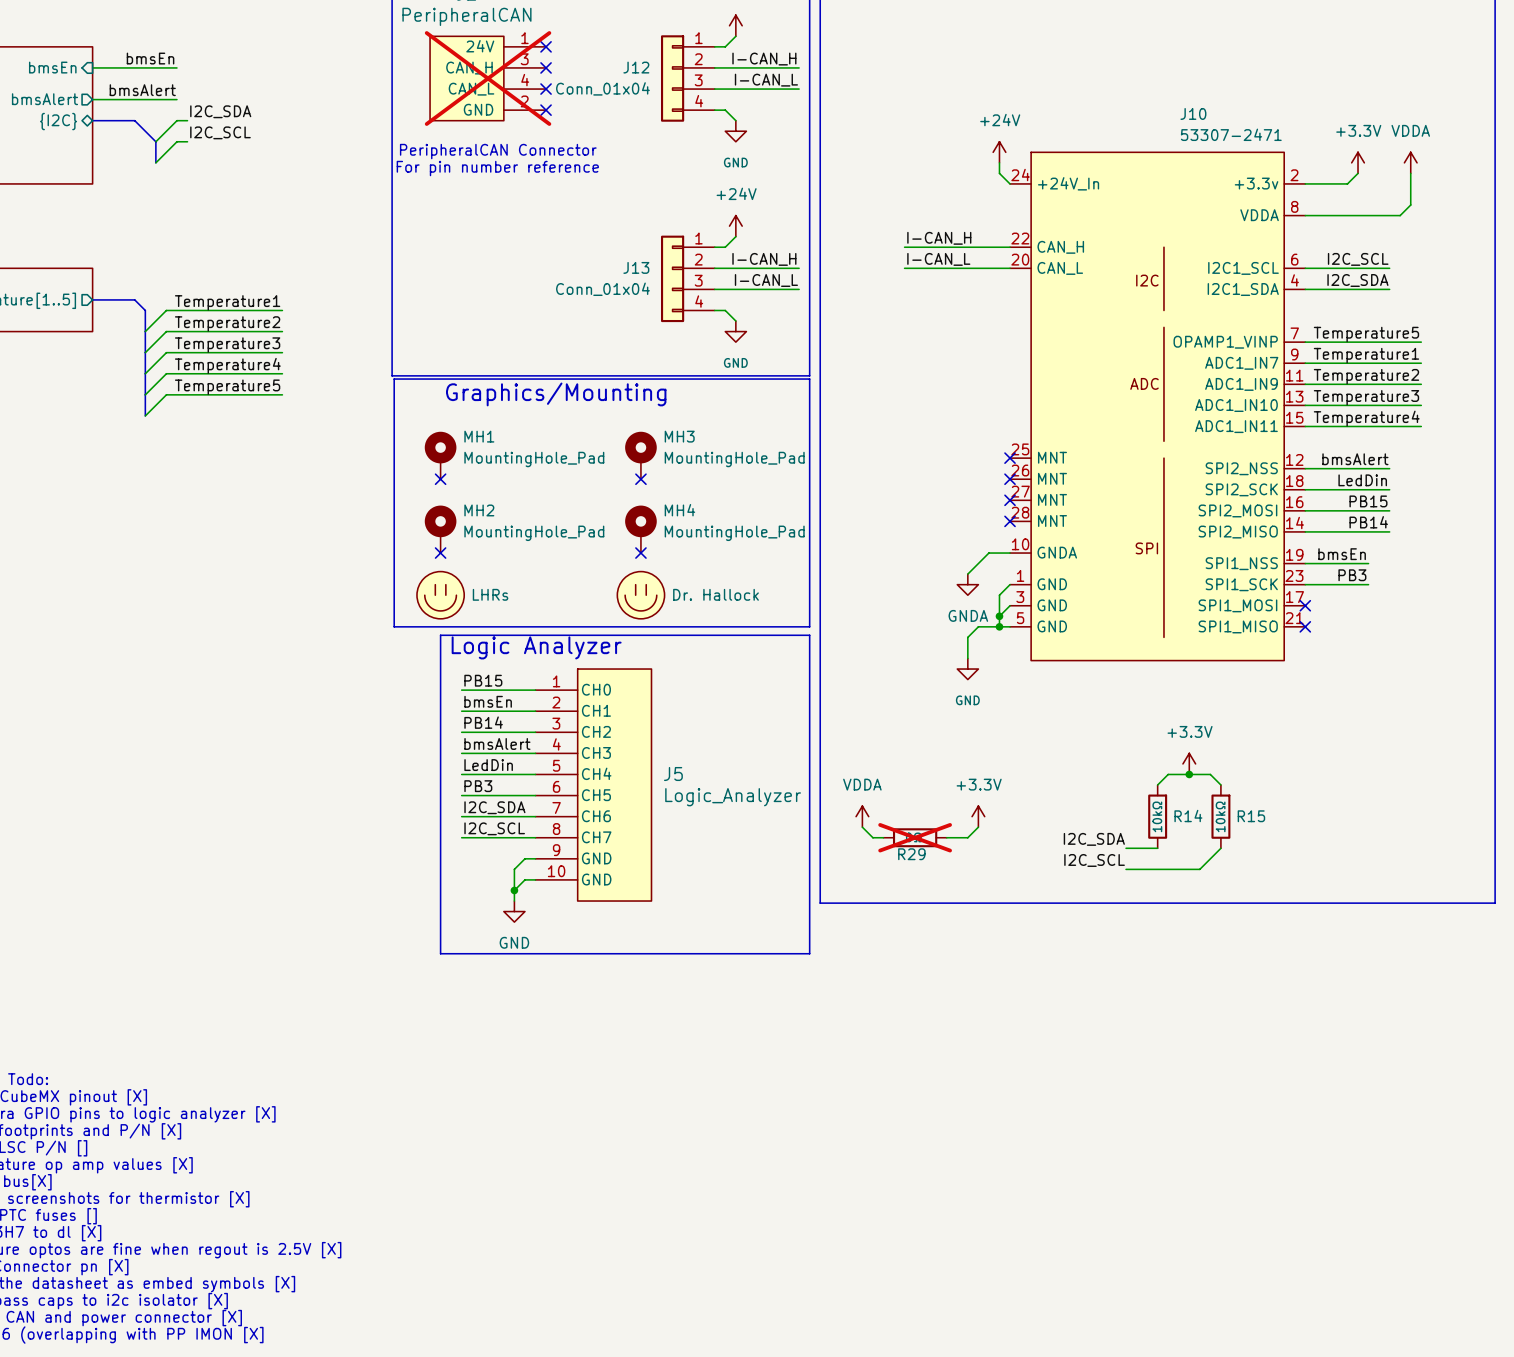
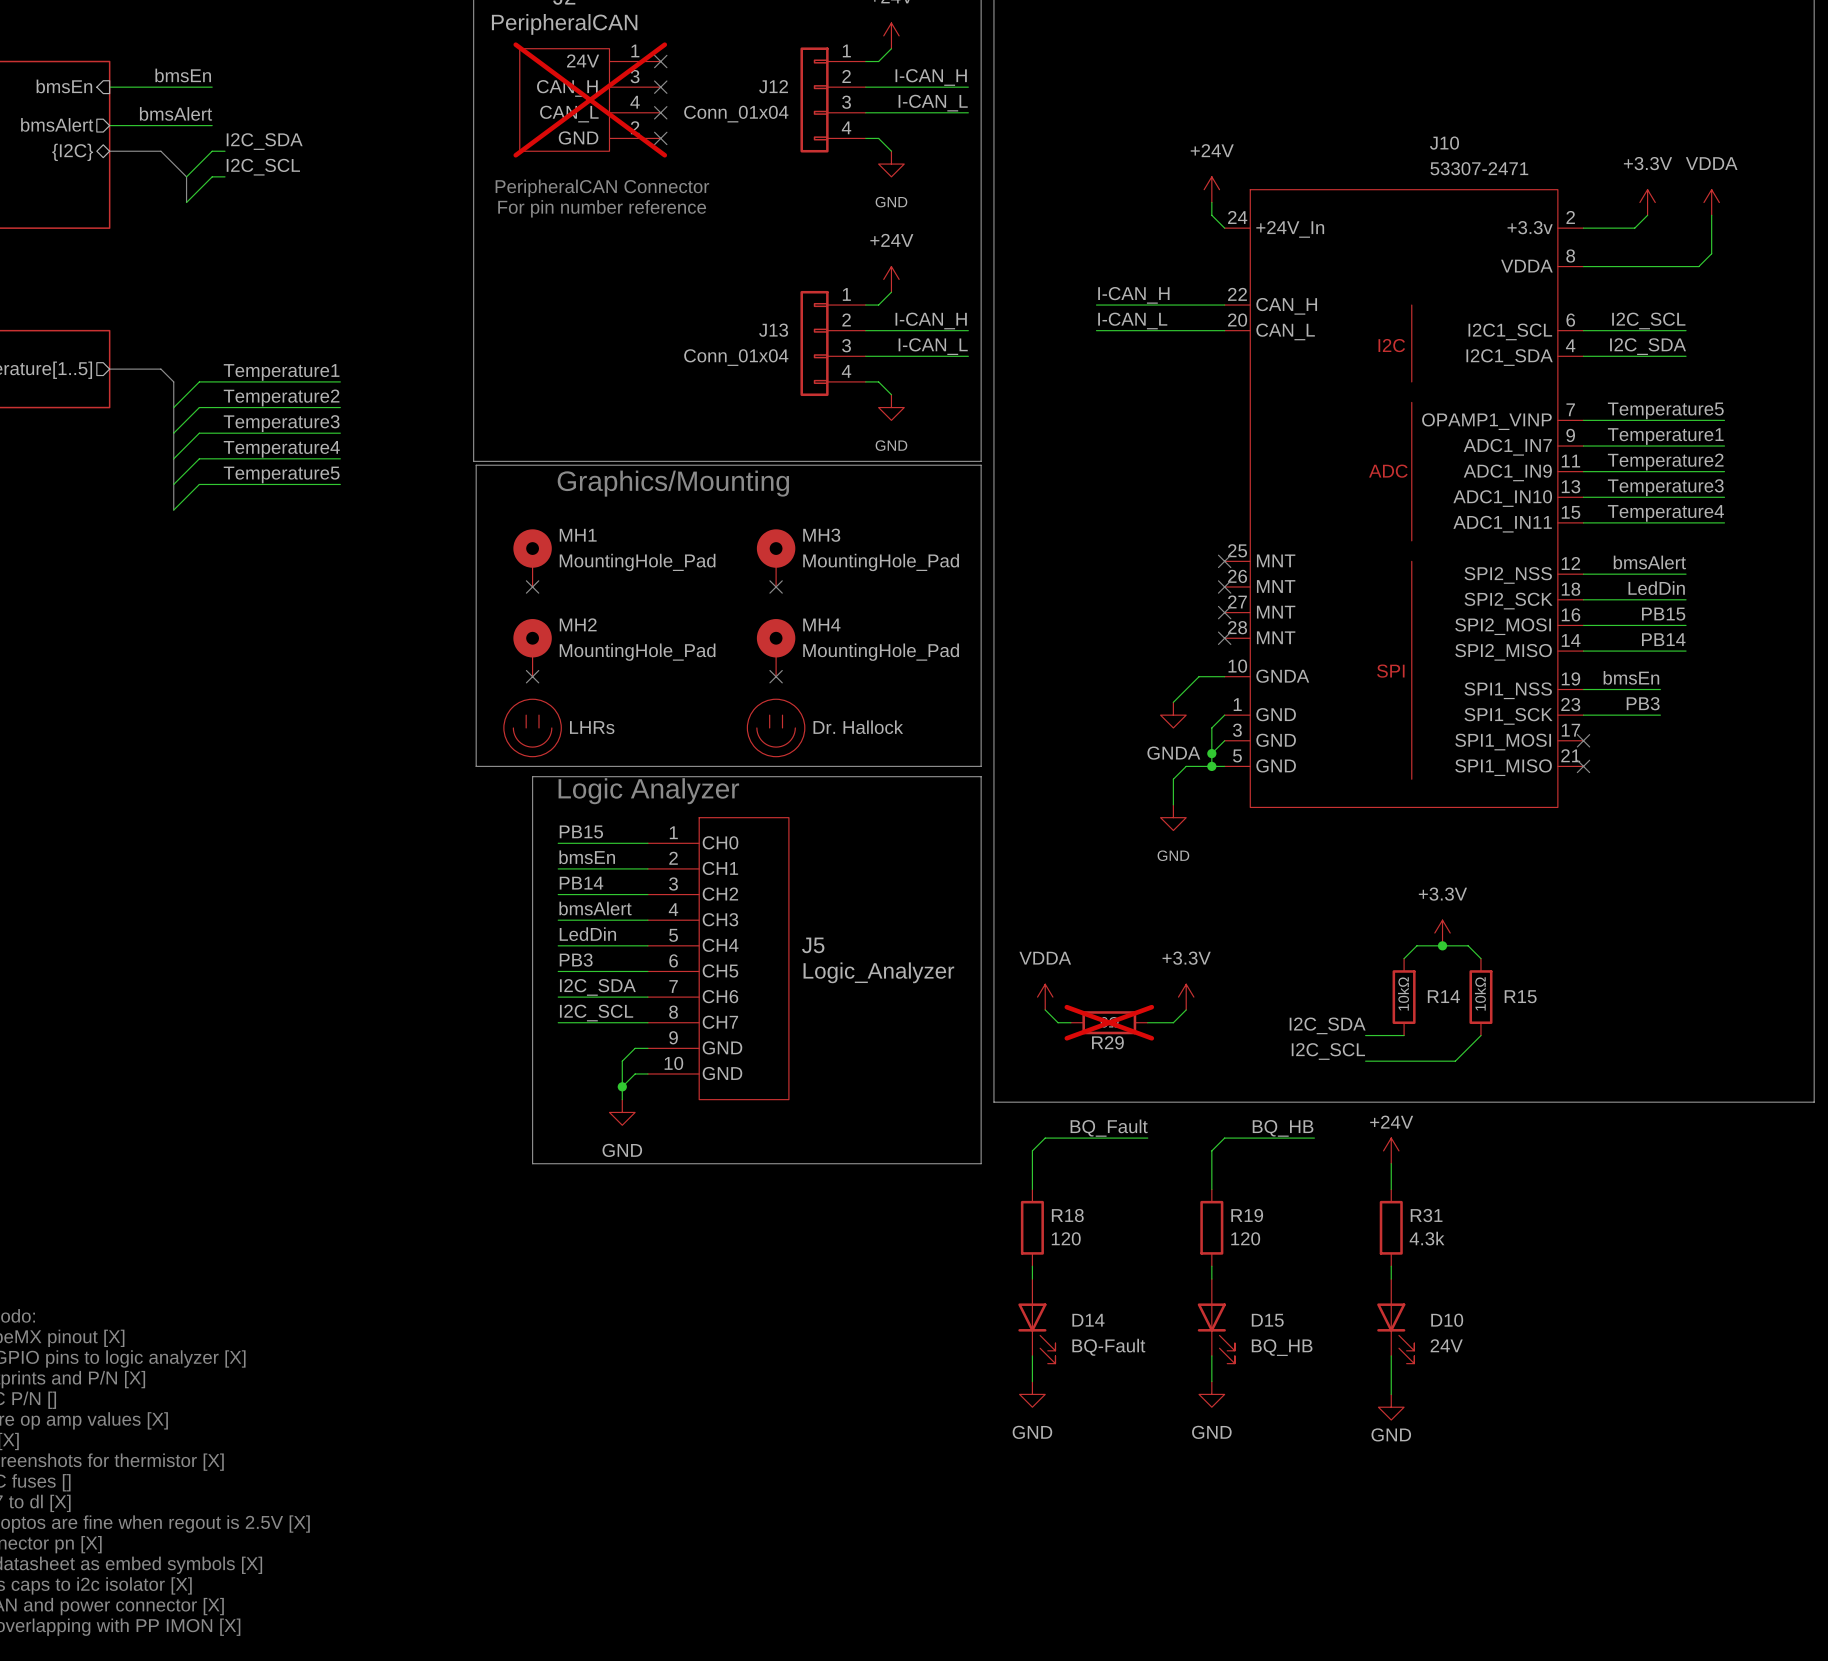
label: none -> BQ_Fault (1109, 1128)
label: none -> BQ_HB (1283, 1128)
wire: none -> (1147, 1138) (1045, 1138) (1032, 1150) (1032, 1189)
wire: none -> (1314, 1138) (1224, 1138) (1211, 1150) (1211, 1189)
power symbol: none -> +24V (1391, 1150)
wire: none -> (1391, 1163) (1391, 1189)
R18: none -> 120 (1032, 1227)
R19: none -> 120 (1211, 1227)
R31: none -> 4.3k (1391, 1227)
wire: none -> (1032, 1266) (1032, 1279)
wire: none -> (1211, 1266) (1211, 1279)
wire: none -> (1391, 1266) (1391, 1279)
D14: none -> BQ-Fault (1036, 1321)
D15: none -> BQ_HB (1216, 1321)
D10: none -> 24V (1395, 1321)
wire: none -> (1032, 1355) (1032, 1381)
wire: none -> (1211, 1355) (1211, 1381)
wire: none -> (1391, 1355) (1391, 1394)
power symbol: none -> GND (1032, 1394)
power symbol: none -> GND (1211, 1394)
power symbol: none -> GND (1391, 1407)

